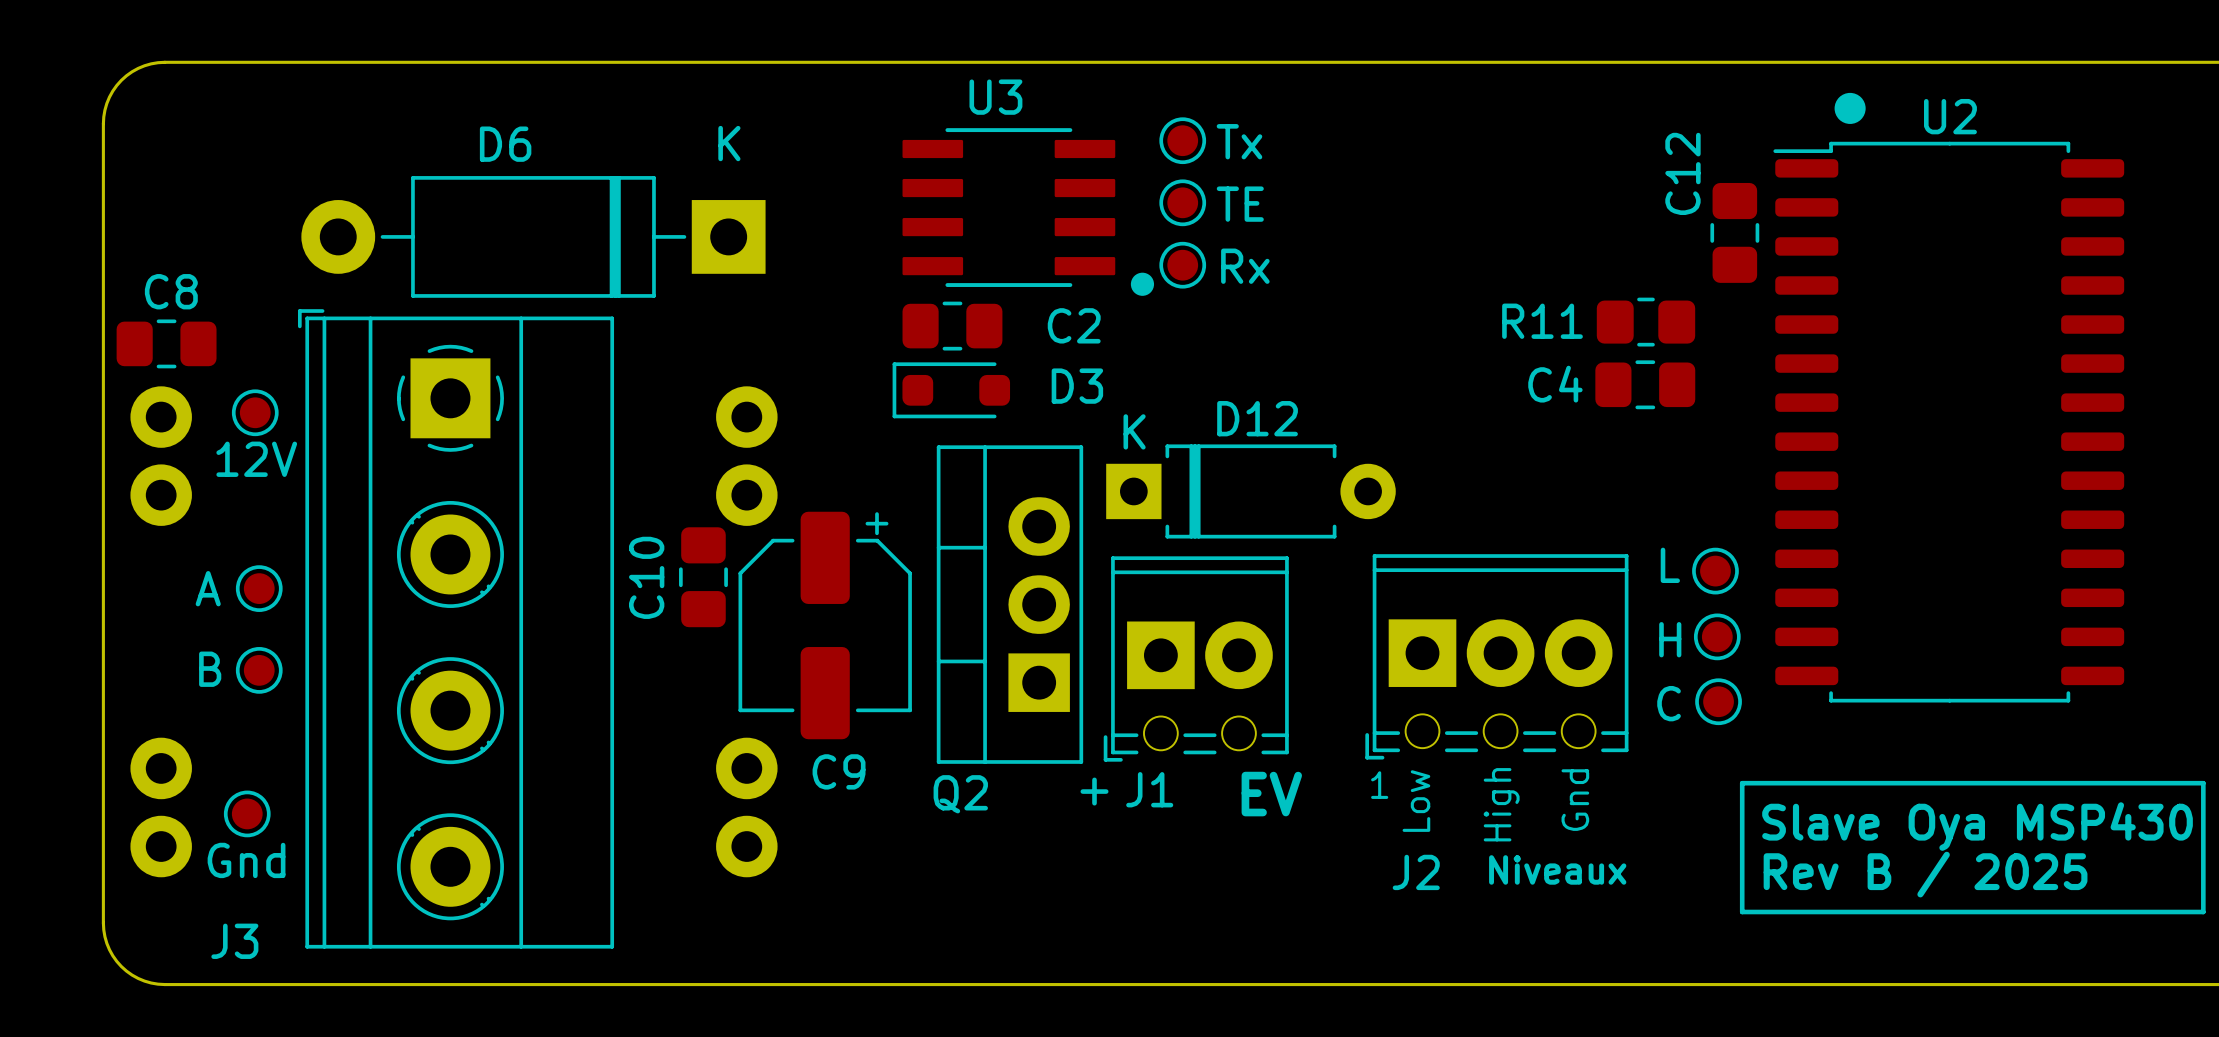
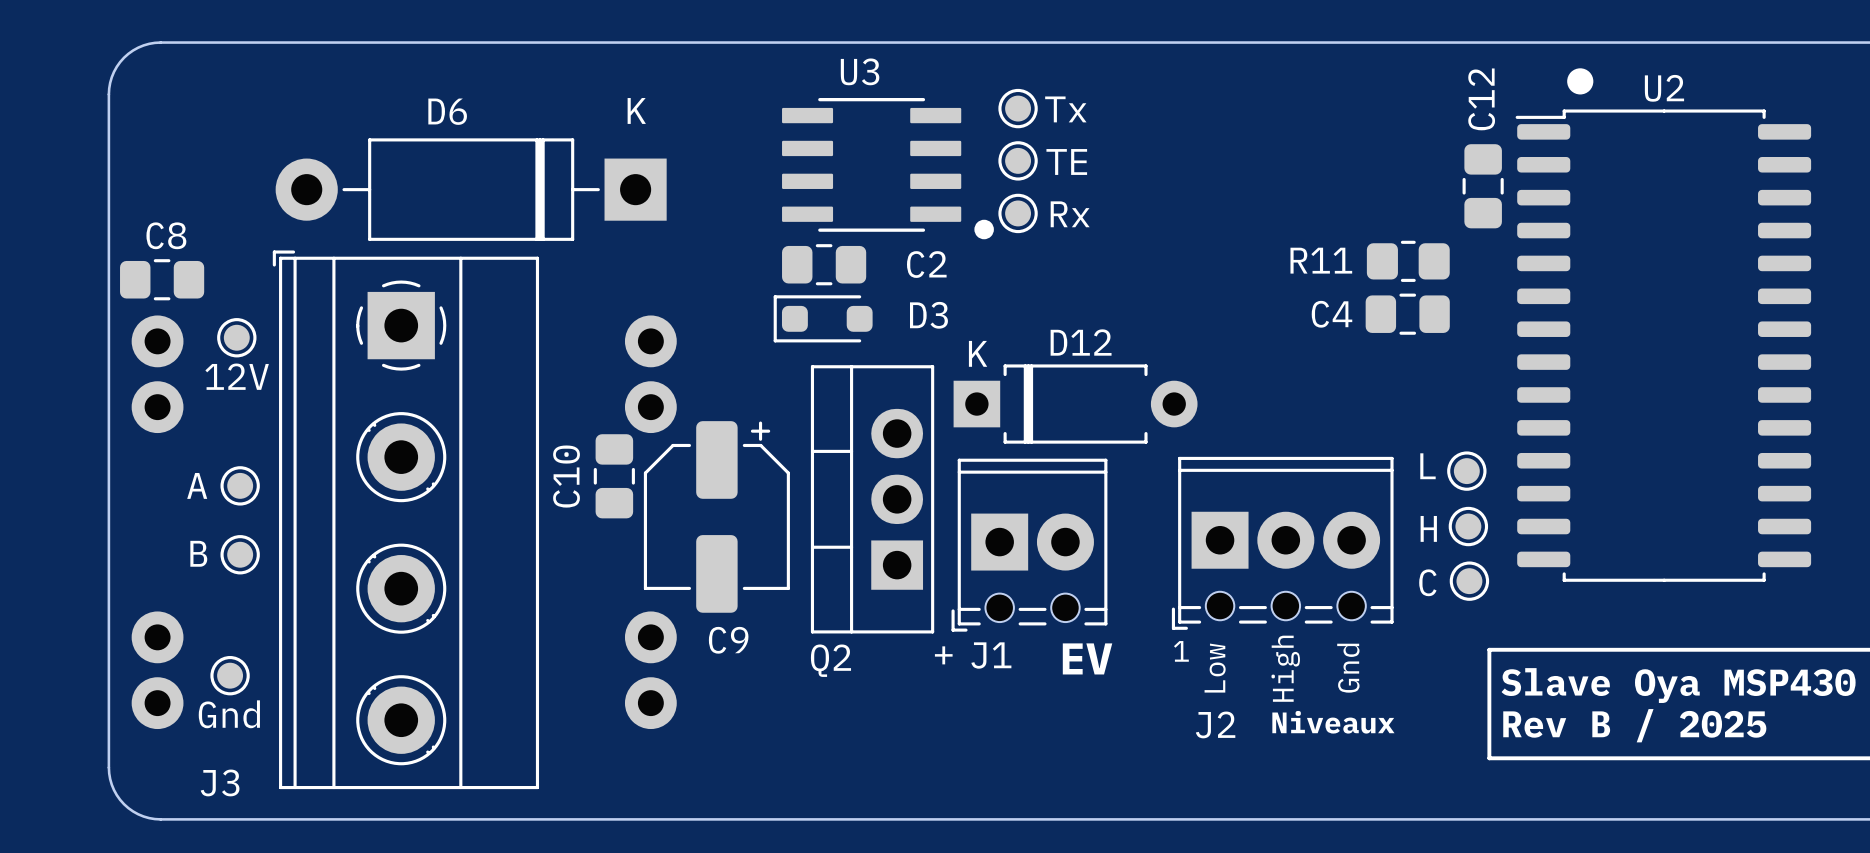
C12 name position: C12 (1682, 173) -> C12 (1481, 99)

